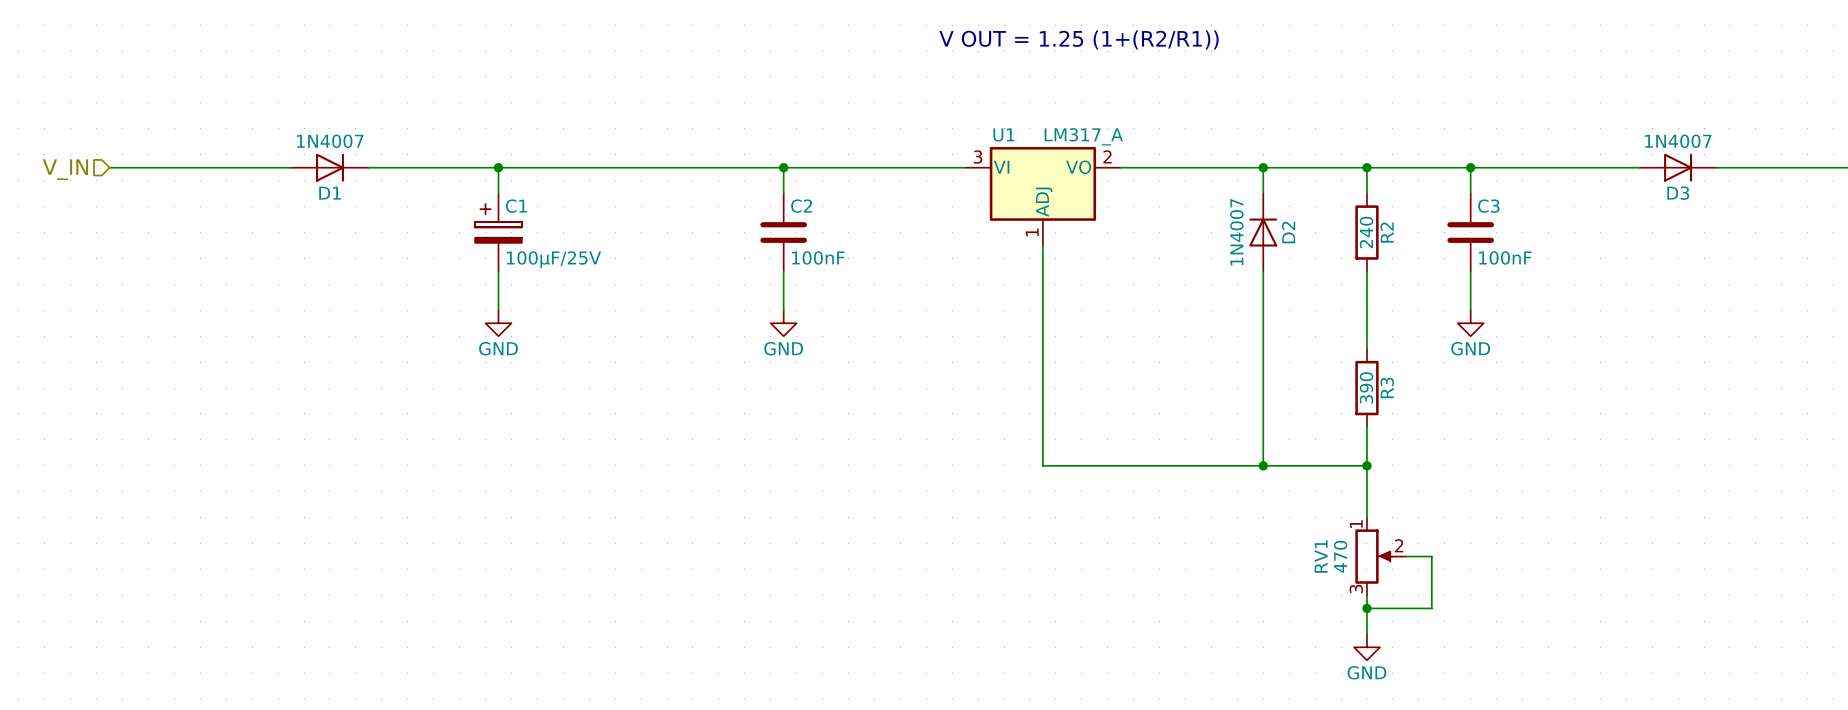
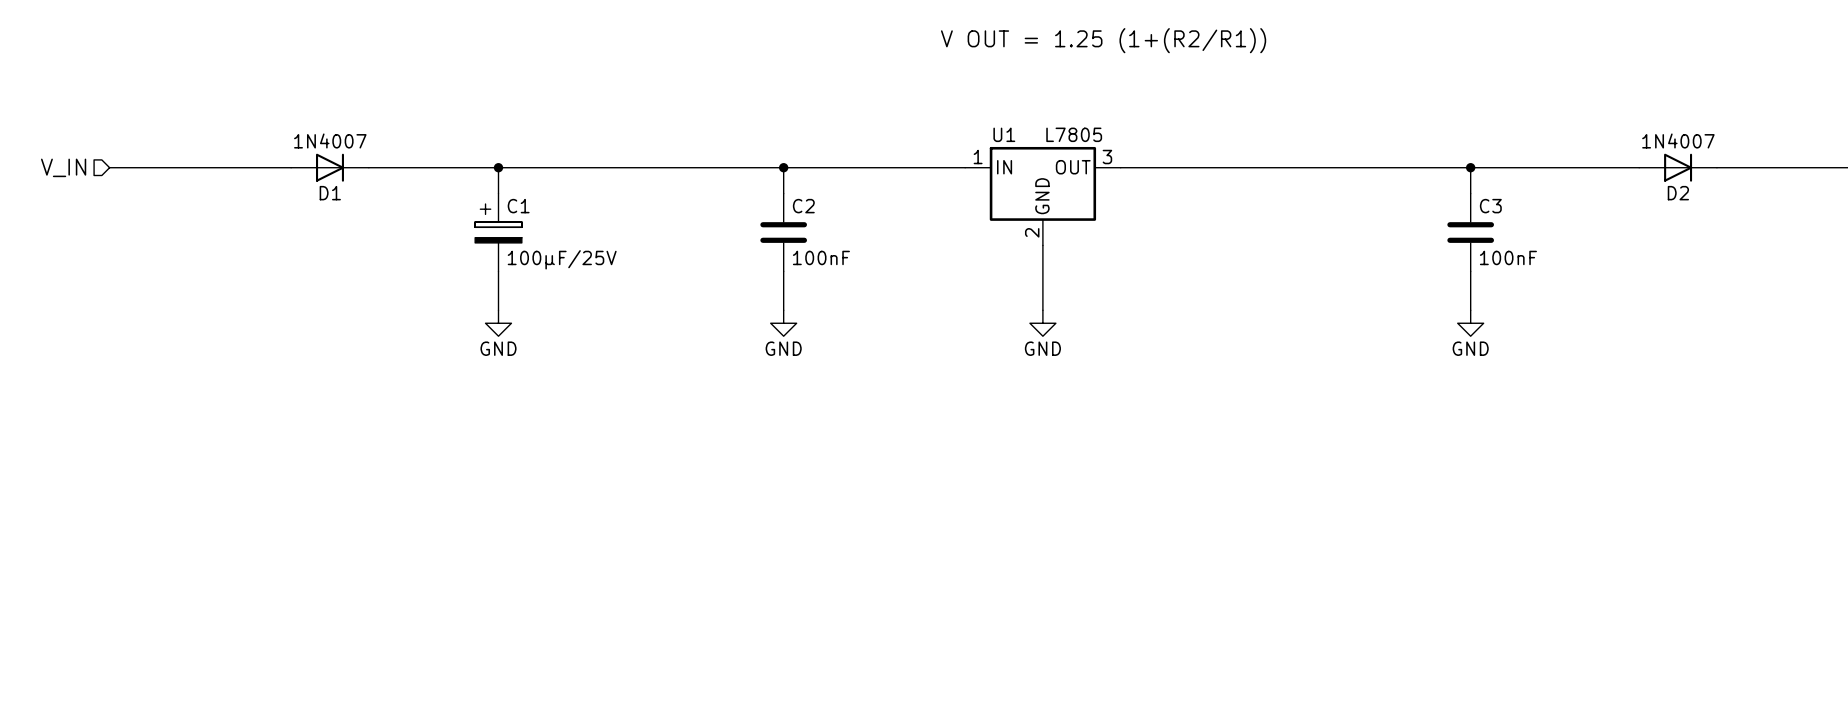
U1 value: LM317_A (1083, 136) -> L7805 (1074, 134)
U1 pin number: 2 (1107, 156) -> 3 (1107, 157)
U1 pin number: 3 (978, 157) -> 1 (978, 157)
U1 pin name: VI (1001, 167) -> IN (1004, 167)
U1 pin name: VO (1078, 167) -> OUT (1073, 167)
wire: (1263, 167) (1263, 193) -> none
junction: (1263, 167) -> none
wire: (1366, 167) (1366, 193) -> none
junction: (1366, 167) -> none
D3 name: D3 (1678, 193) -> D2 (1678, 193)
U1 pin name: ADJ (1044, 202) -> GND (1042, 196)
U1 pin number: 1 (1032, 232) -> 2 (1032, 232)
D2: 1N4007 (1263, 232) -> none
R2: 240 (1366, 232) -> none
wire: (1263, 271) (1263, 465) -> none
wire: (1366, 271) (1366, 349) -> none
wire: (1042, 310) (1042, 465) (1366, 465) -> none
power symbol: none -> GND (1042, 323)
R3: 390 (1366, 388) -> none
wire: (1366, 426) (1366, 517) -> none
junction: (1263, 465) -> none
junction: (1366, 465) -> none
RV1: 470 (1380, 556) -> none
wire: (1405, 556) (1431, 556) (1431, 608) (1366, 608) -> none
wire: (1366, 595) (1366, 634) -> none
junction: (1366, 608) -> none
power symbol: GND (1366, 647) -> none

